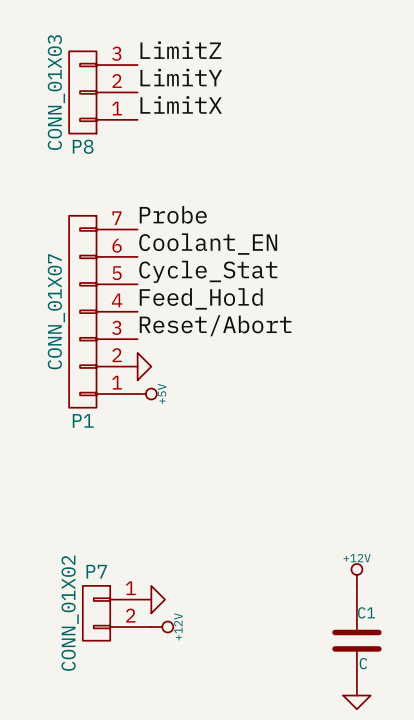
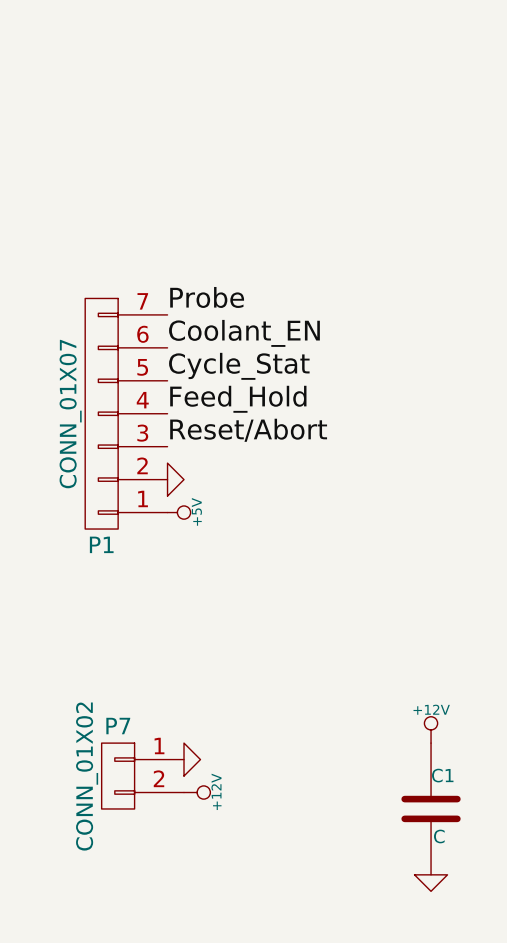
label: LimitZ (180, 50) -> none
label: LimitY (181, 77) -> none
P8: CONN_01X03 (103, 92) -> none
label: LimitX (181, 104) -> none

